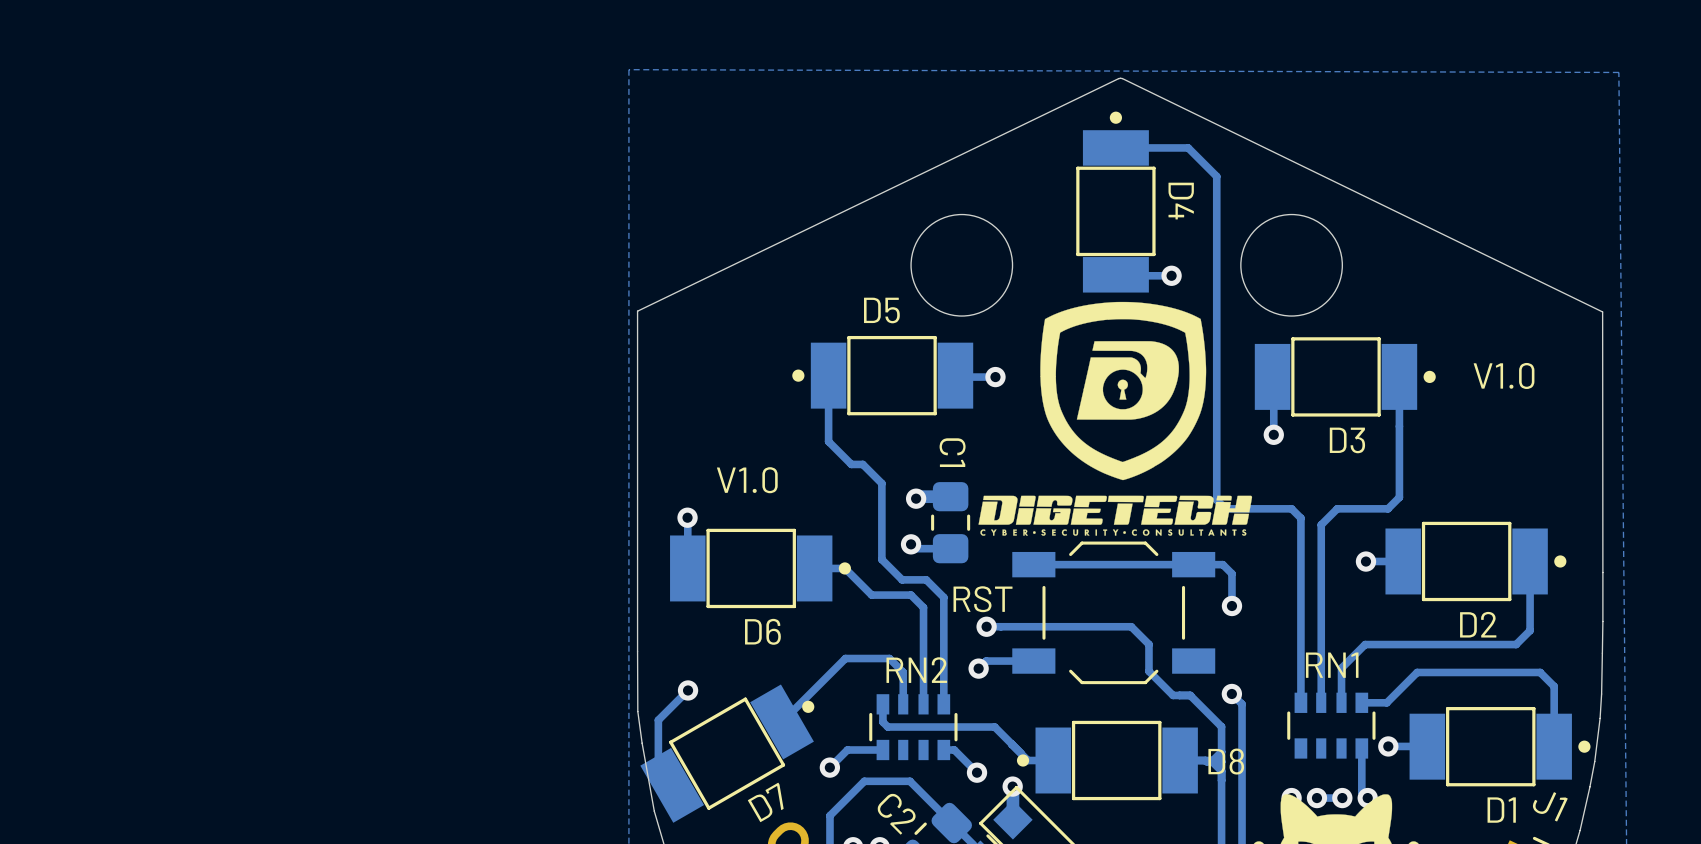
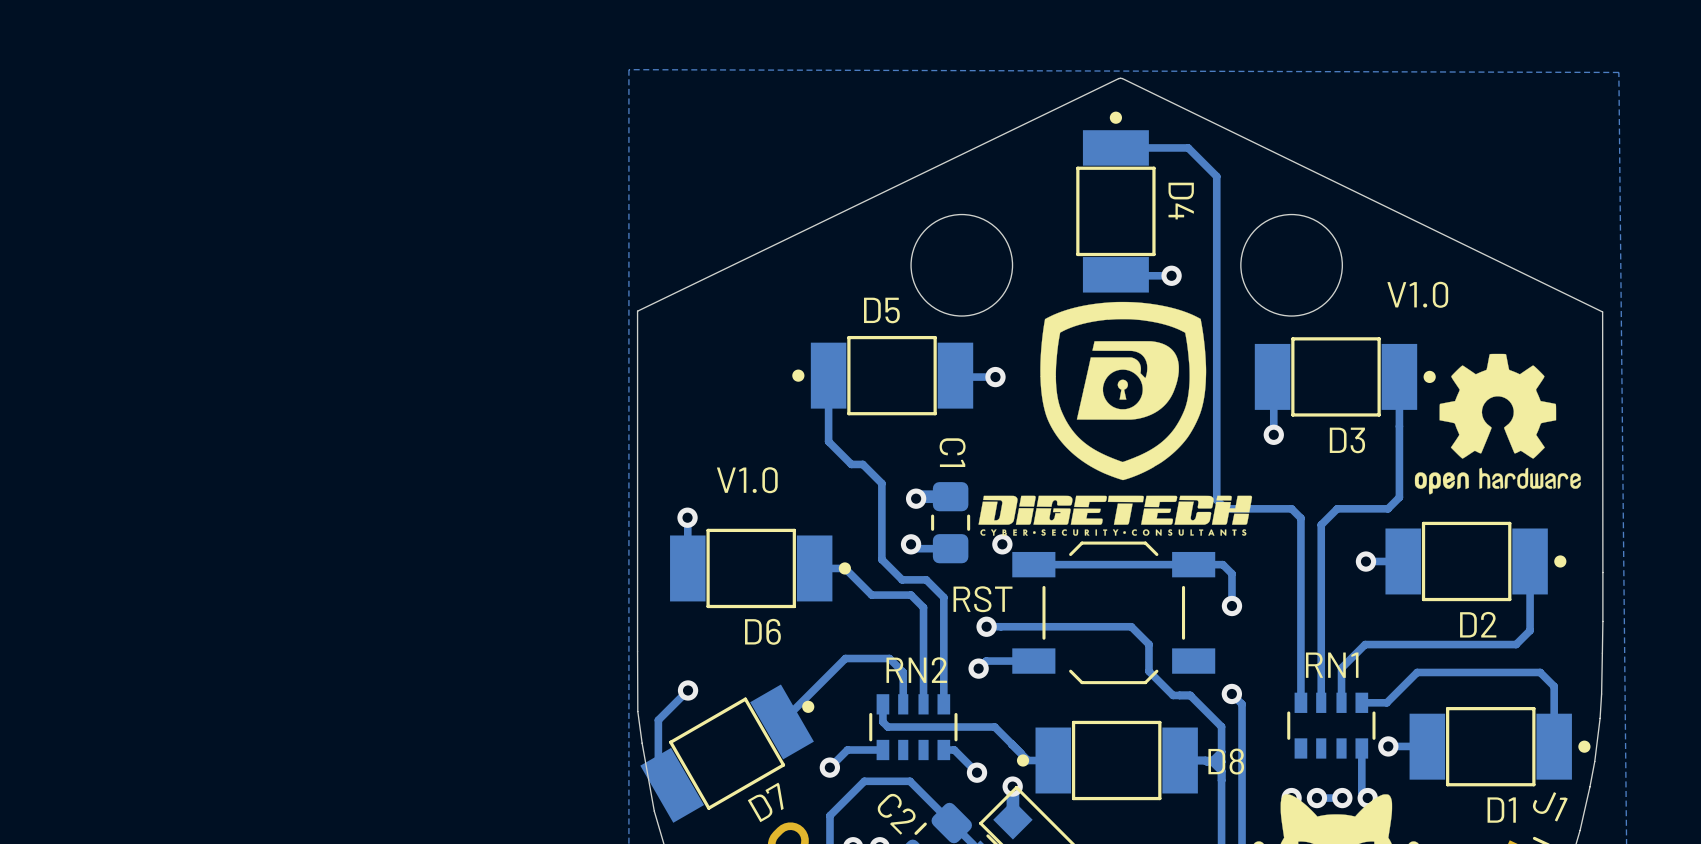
drawing: none -> [1414, 353, 1581, 495]
text position: V1.0 (1504, 375) -> V1.0 (1417, 294)
via: none -> (1002, 544)

